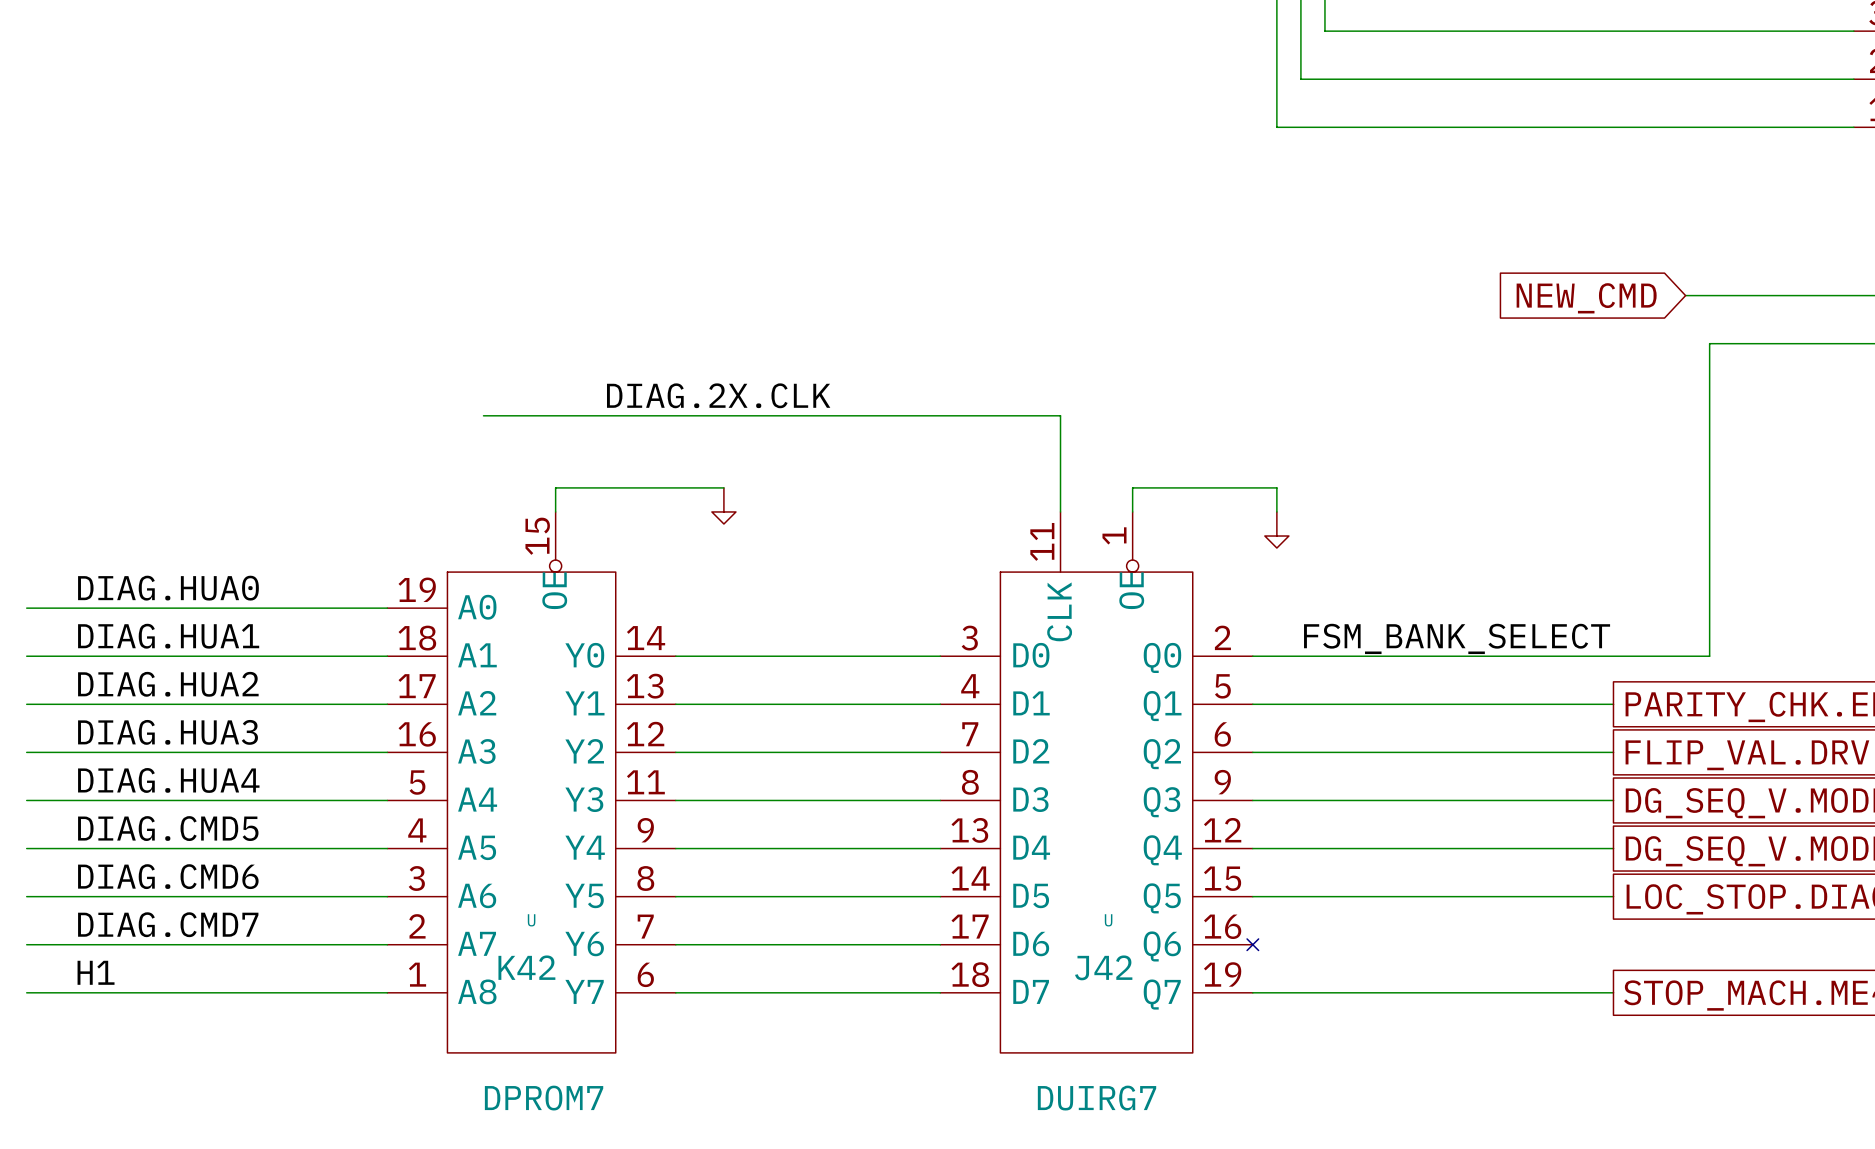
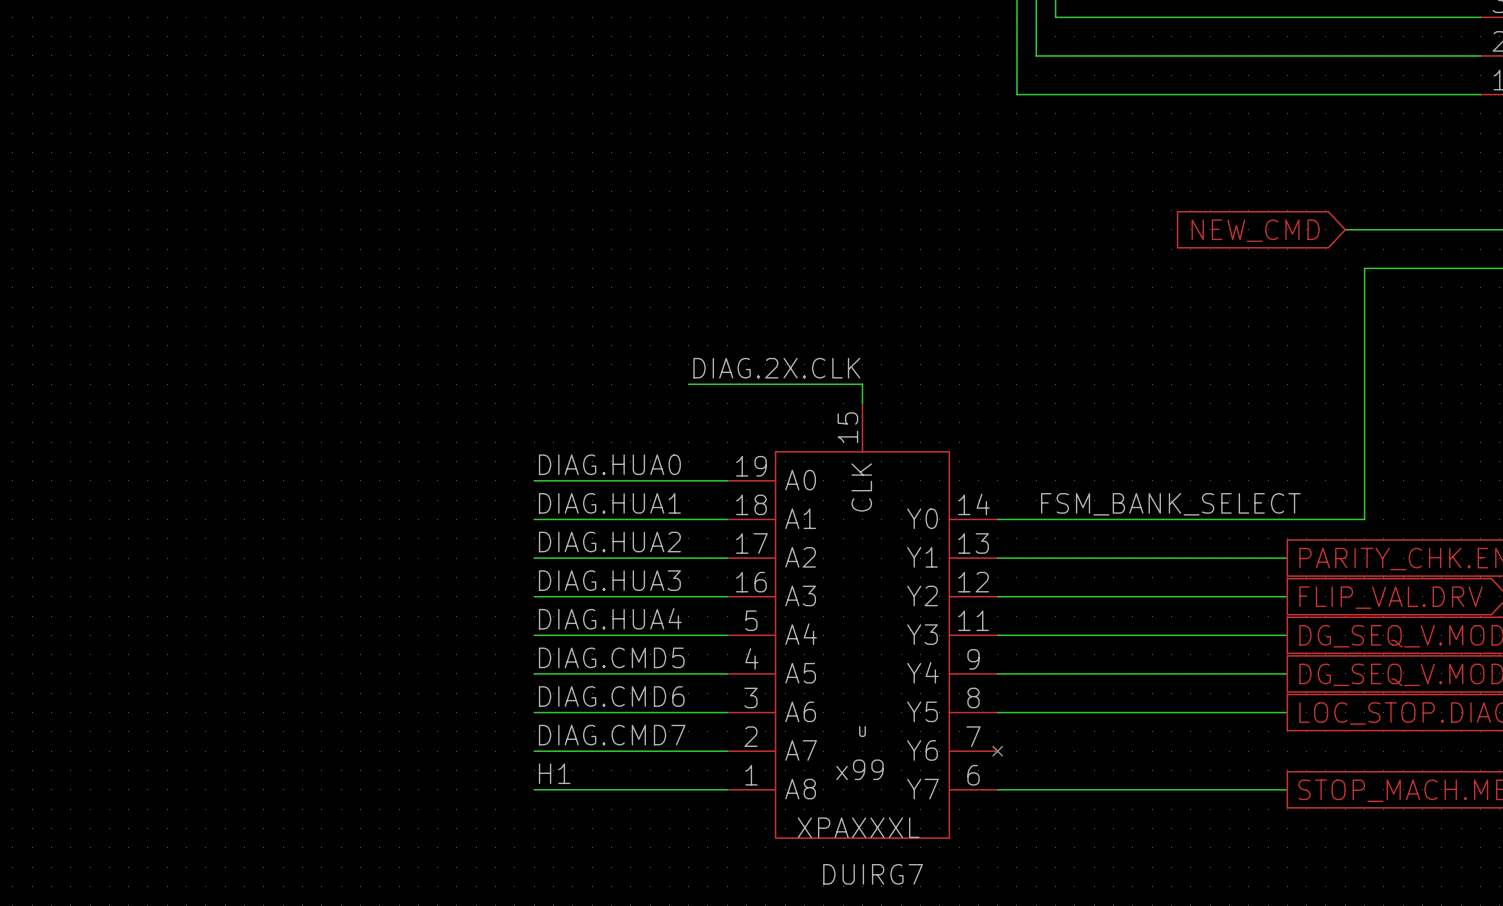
label: DIAG.2X.CLK (718, 395) -> none
wire: (483, 415) (1060, 415) (1060, 511) -> none
label: none -> DIAG.2X.CLK (776, 368)
wire: (723, 487) (555, 487) (555, 511) -> none
wire: none -> (688, 384) (862, 384) (862, 403)
power symbol: (723, 506) -> none
wire: (1132, 511) (1132, 487) (1276, 487) (1276, 511) -> none
power symbol: (1276, 530) -> none
label: DIAG.HUA0 (168, 588) -> none
label: none -> DIAG.HUA0 (609, 464)
wire: (26, 608) (387, 608) -> none
wire: none -> (534, 480) (727, 480)
label: DIAG.HUA1 (168, 636) -> none
label: none -> DIAG.HUA1 (609, 503)
wire: (26, 656) (387, 656) -> none
label: DIAG.HUA2 (168, 684) -> none
label: none -> DIAG.HUA2 (609, 542)
wire: (26, 704) (387, 704) -> none
label: DIAG.HUA3 (168, 732) -> none
label: none -> DIAG.HUA3 (609, 580)
wire: (26, 752) (387, 752) -> none
label: DIAG.HUA4 (168, 780) -> none
label: none -> DIAG.HUA4 (610, 618)
U: (531, 782) -> none
U: none -> XPAXXXL (862, 620)
U: (1096, 782) -> none
wire: (26, 800) (387, 800) -> none
label: DIAG.CMD5 (168, 828) -> none
label: none -> DIAG.CMD5 (611, 657)
wire: (26, 848) (387, 848) -> none
label: DIAG.CMD6 (168, 876) -> none
label: none -> DIAG.CMD6 (611, 696)
wire: (26, 896) (387, 896) -> none
label: DIAG.CMD7 (168, 924) -> none
label: none -> DIAG.CMD7 (612, 735)
wire: (26, 944) (387, 944) -> none
label: H1 (96, 972) -> none
label: none -> H1 (554, 773)
wire: (26, 992) (387, 992) -> none

